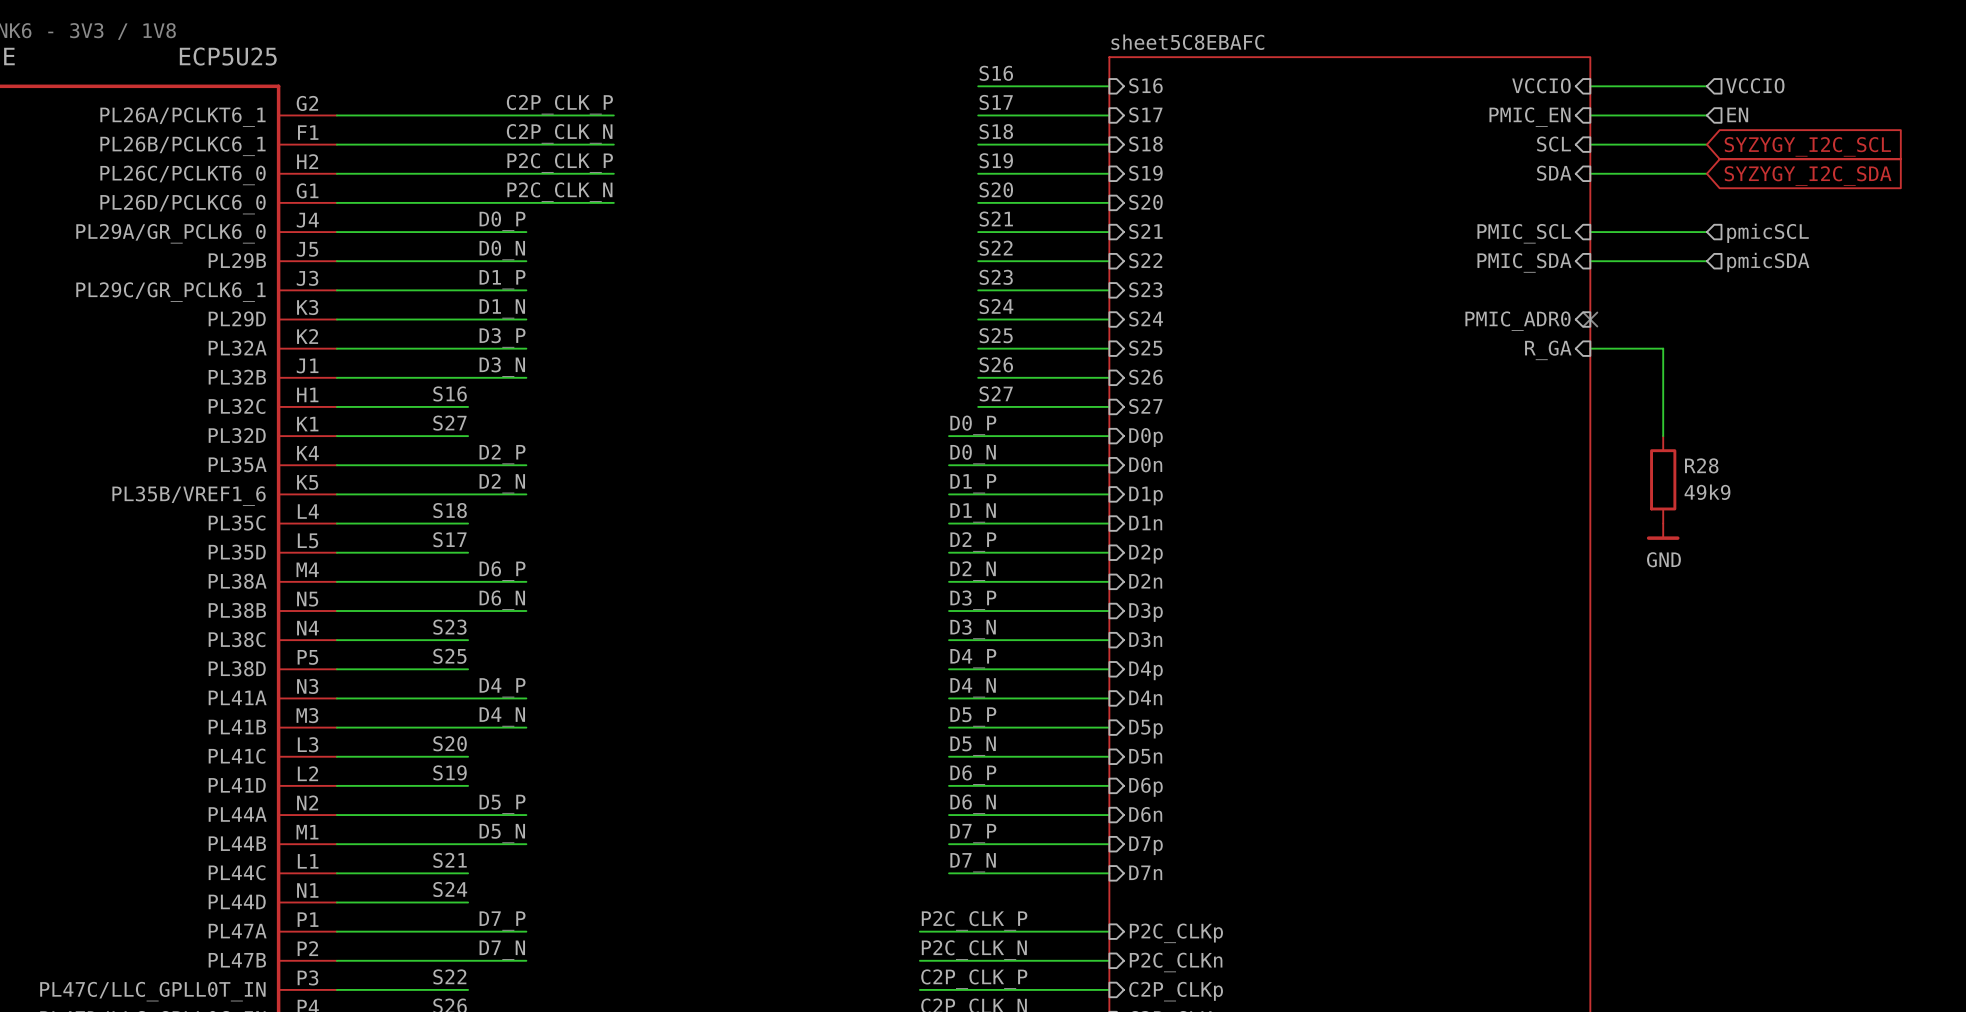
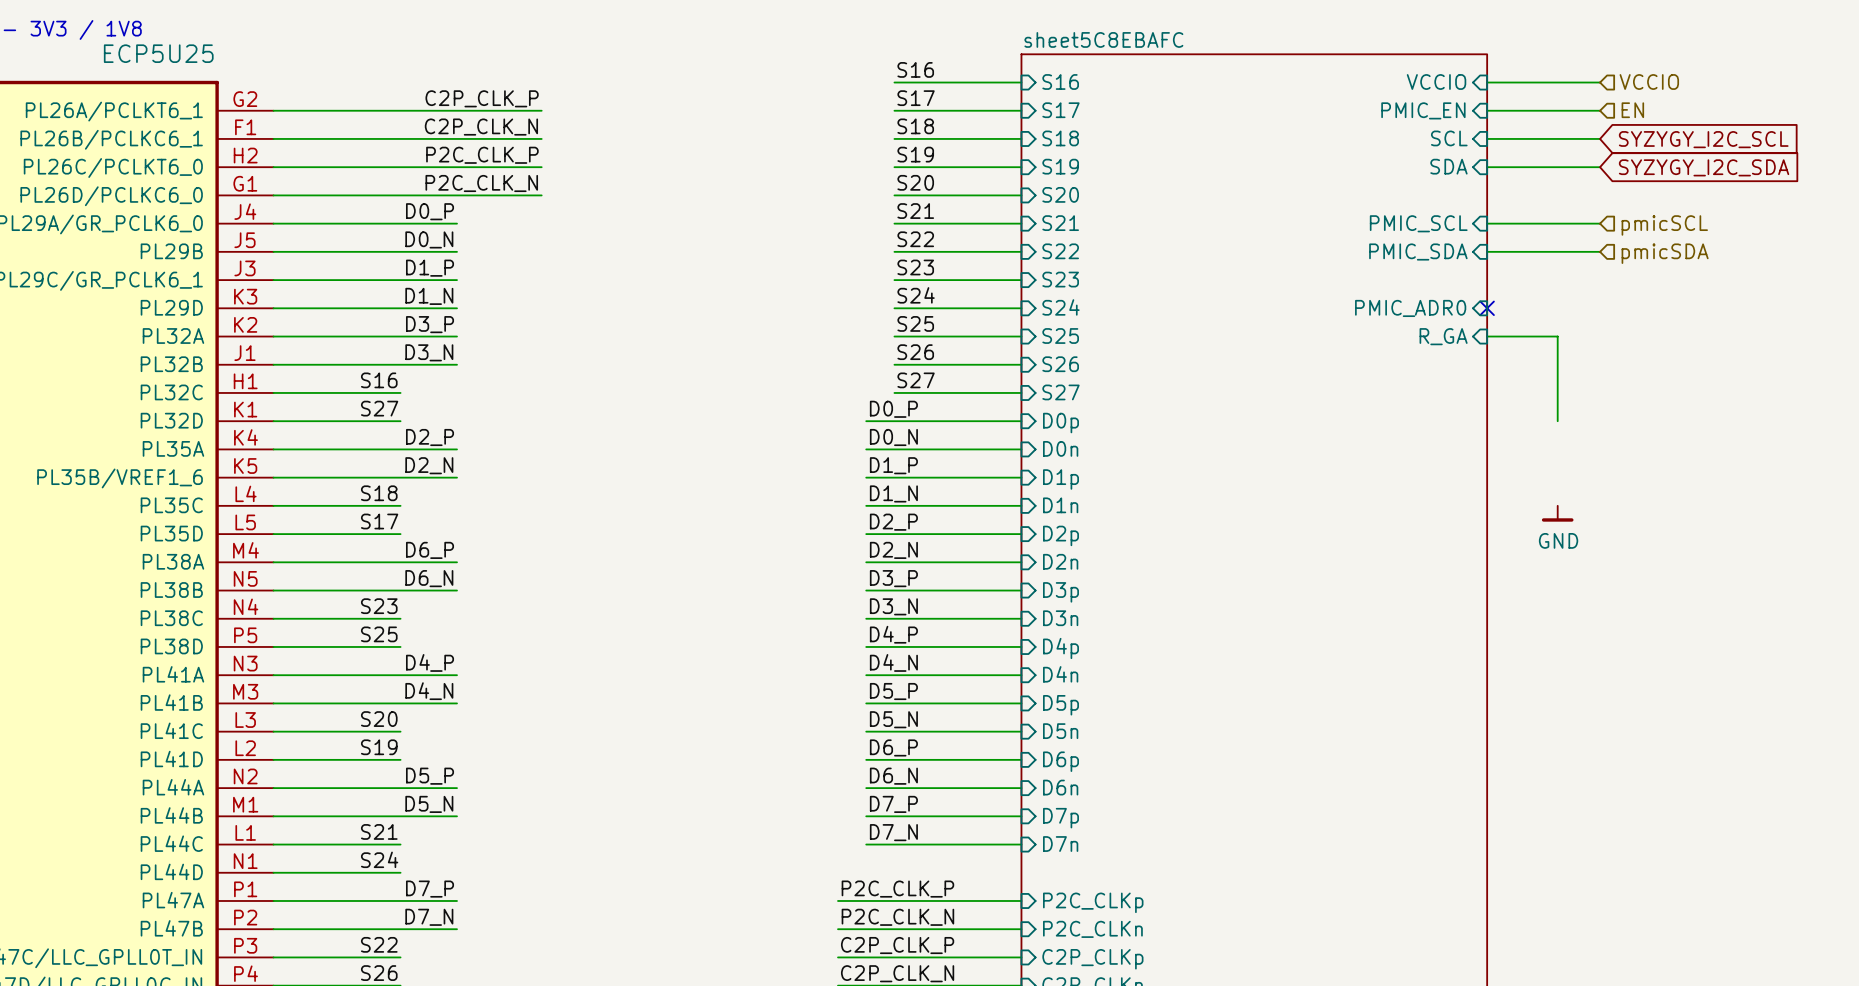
R28: 49k9 (1663, 479) -> none

